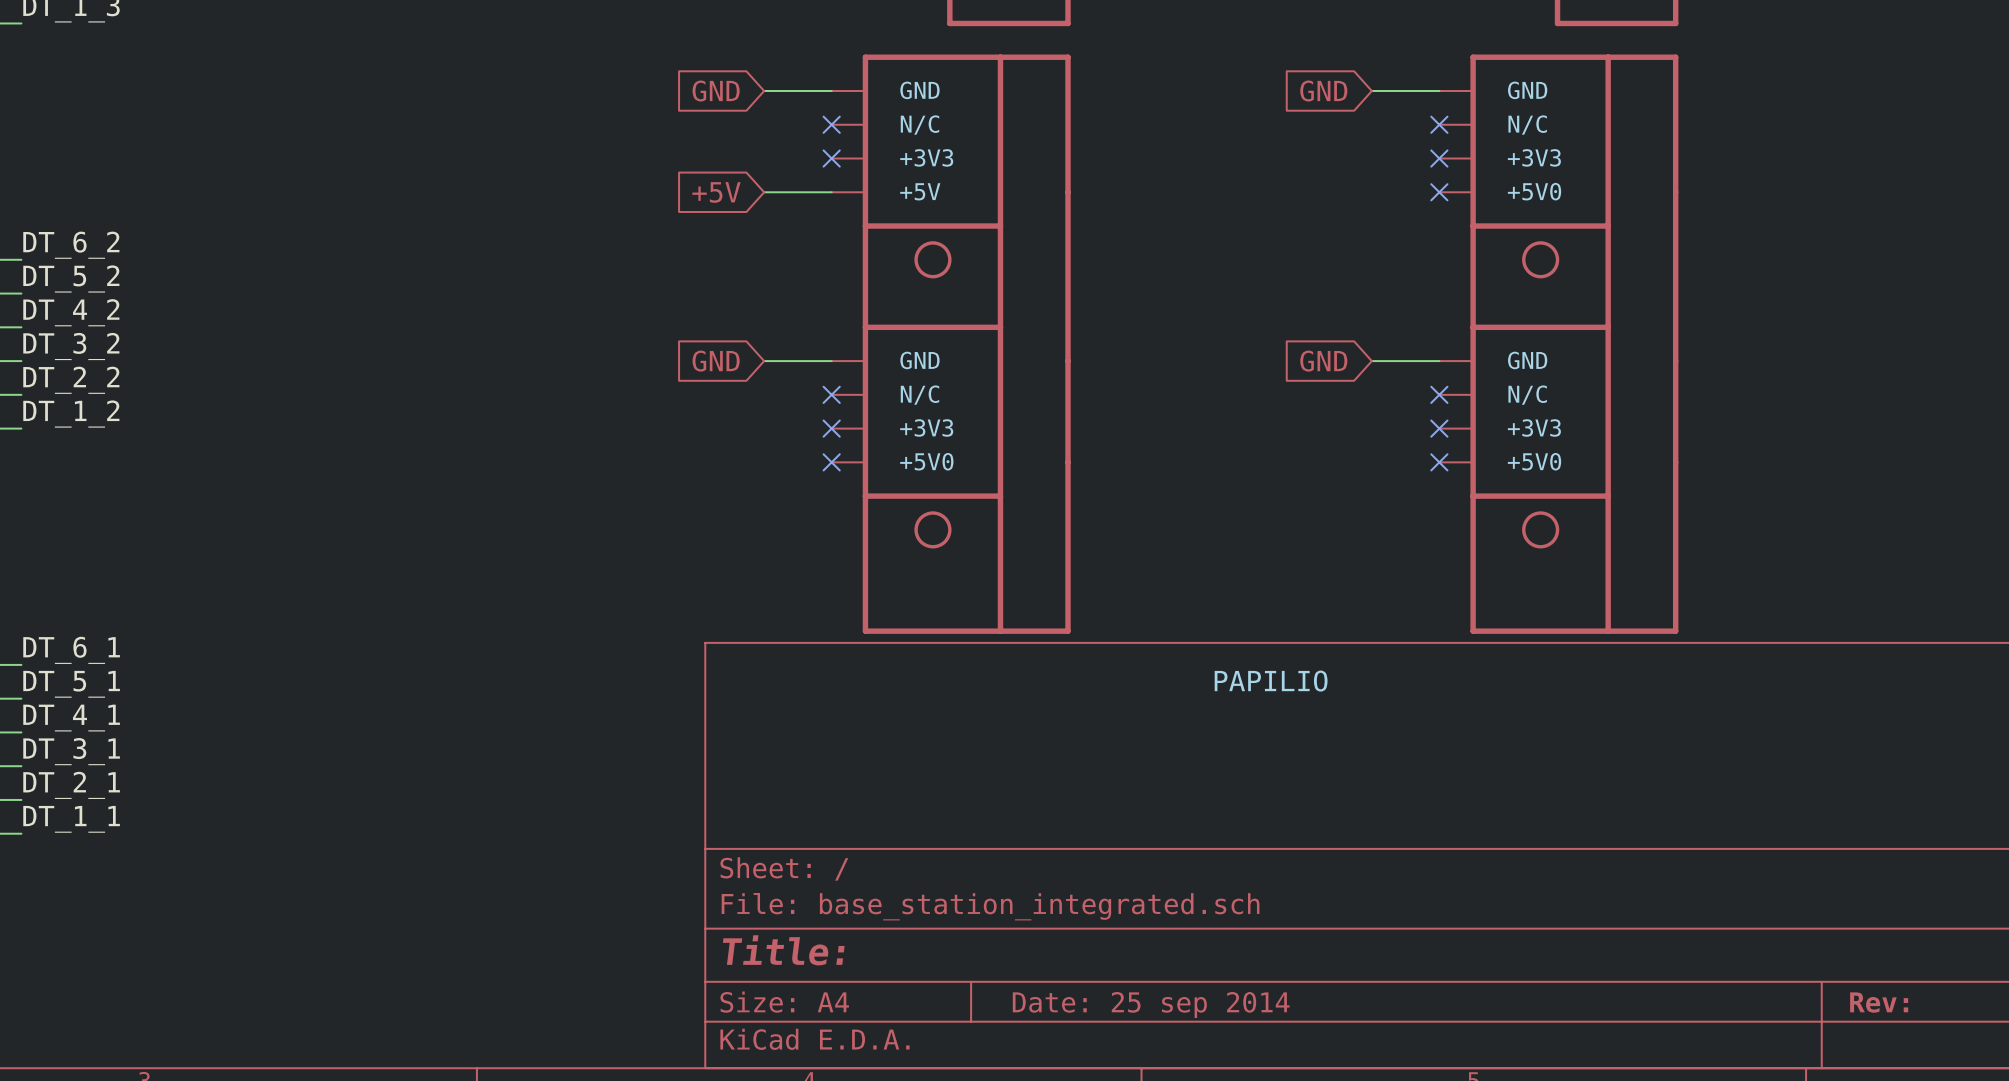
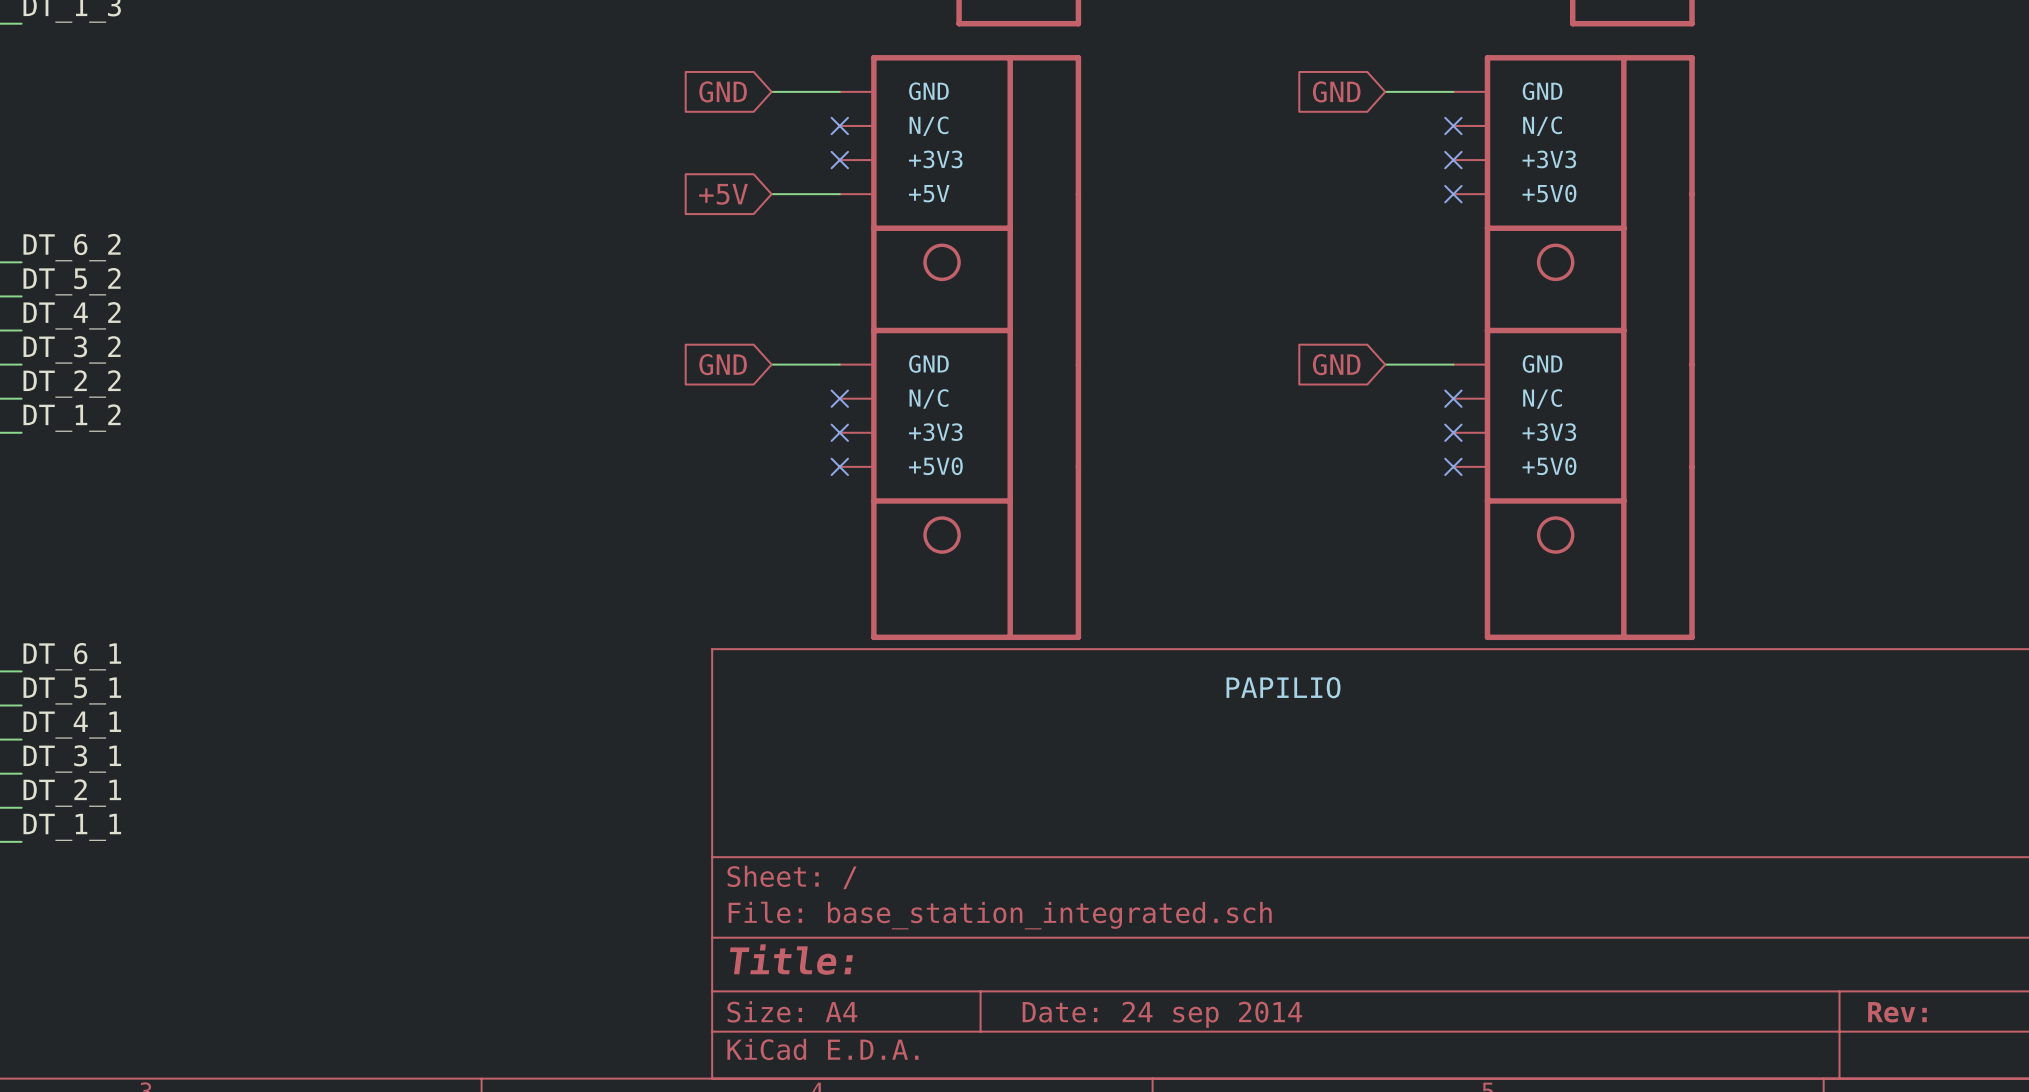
title block: Date: 25 sep 2014 (1151, 1005) -> Date: 24 sep 2014 (1162, 1014)

